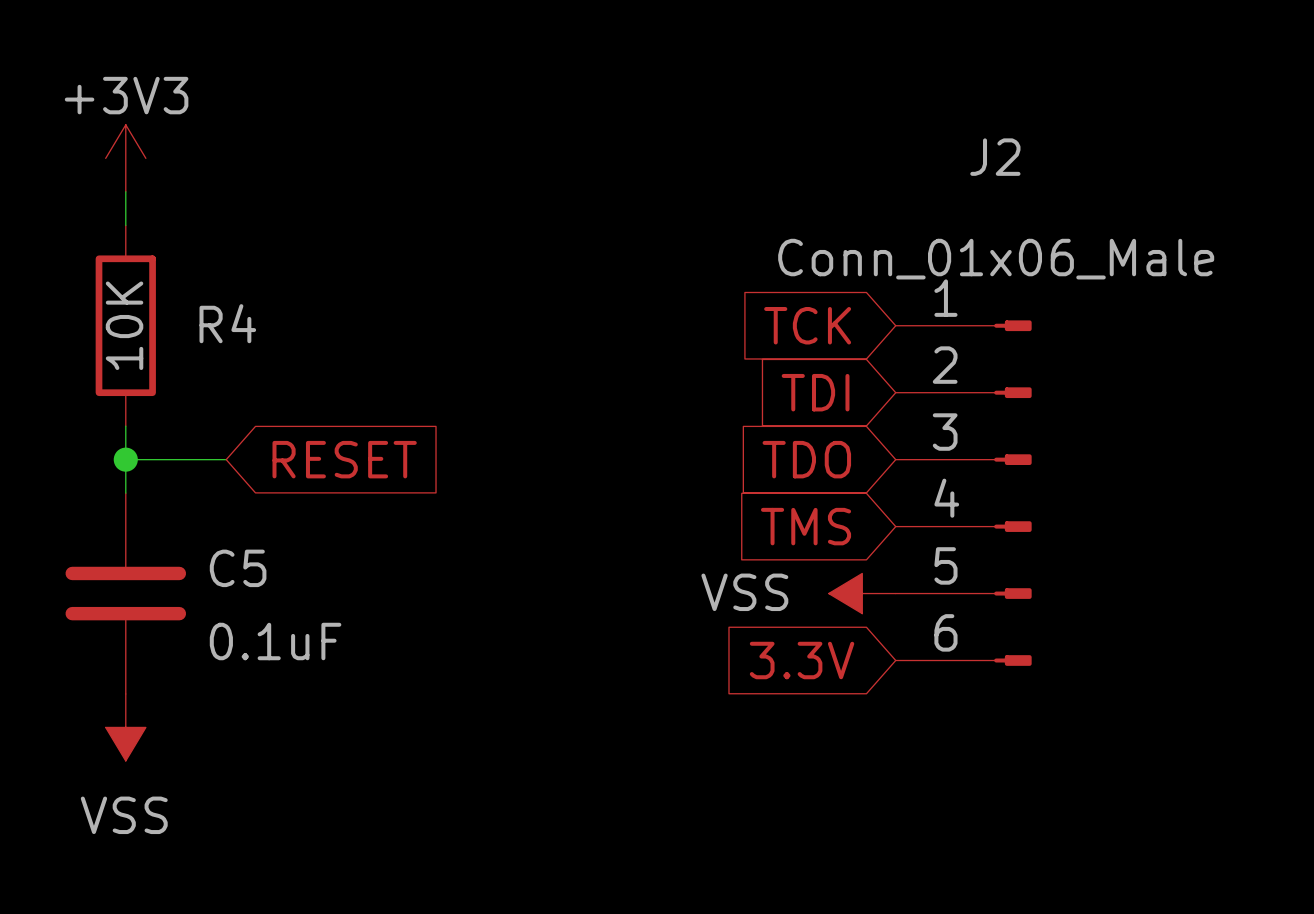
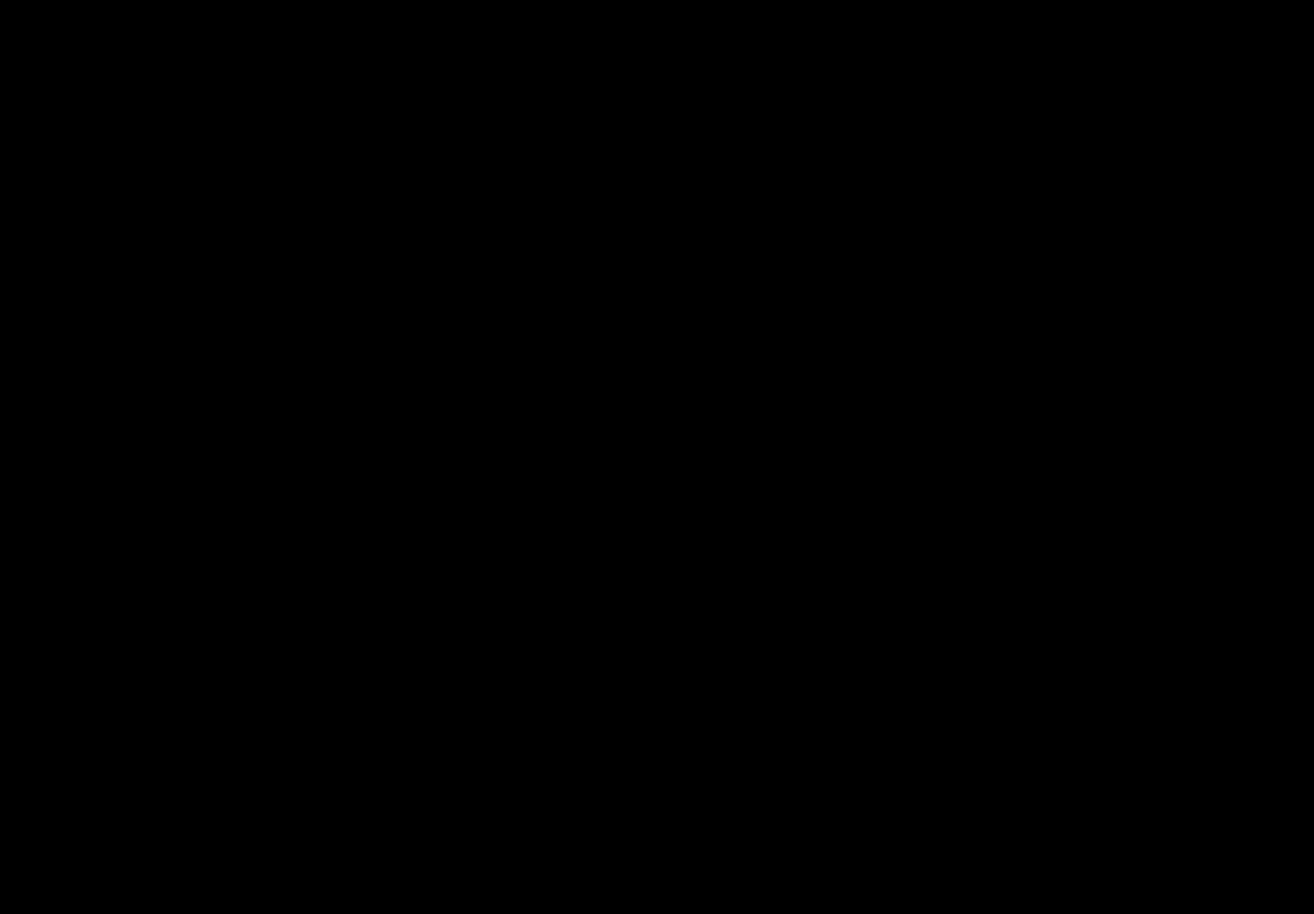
power symbol: +3V3 (125, 158) -> none
wire: (125, 191) (125, 225) -> none
R4: 10K (125, 325) -> none
global label: TCK (807, 325) -> none
global label: TDI (815, 392) -> none
wire: (125, 426) (125, 493) -> none
wire: (125, 459) (226, 459) -> none
junction: (125, 459) -> none
global label: RESET (344, 459) -> none
global label: TDO (806, 459) -> none
J2: Conn_01x06_Male (963, 493) -> none
global label: TMS (806, 526) -> none
C5: 0.1uF (125, 593) -> none
power symbol: VSS (862, 593) -> none
global label: 3.3V (802, 660) -> none
power symbol: VSS (125, 727) -> none

